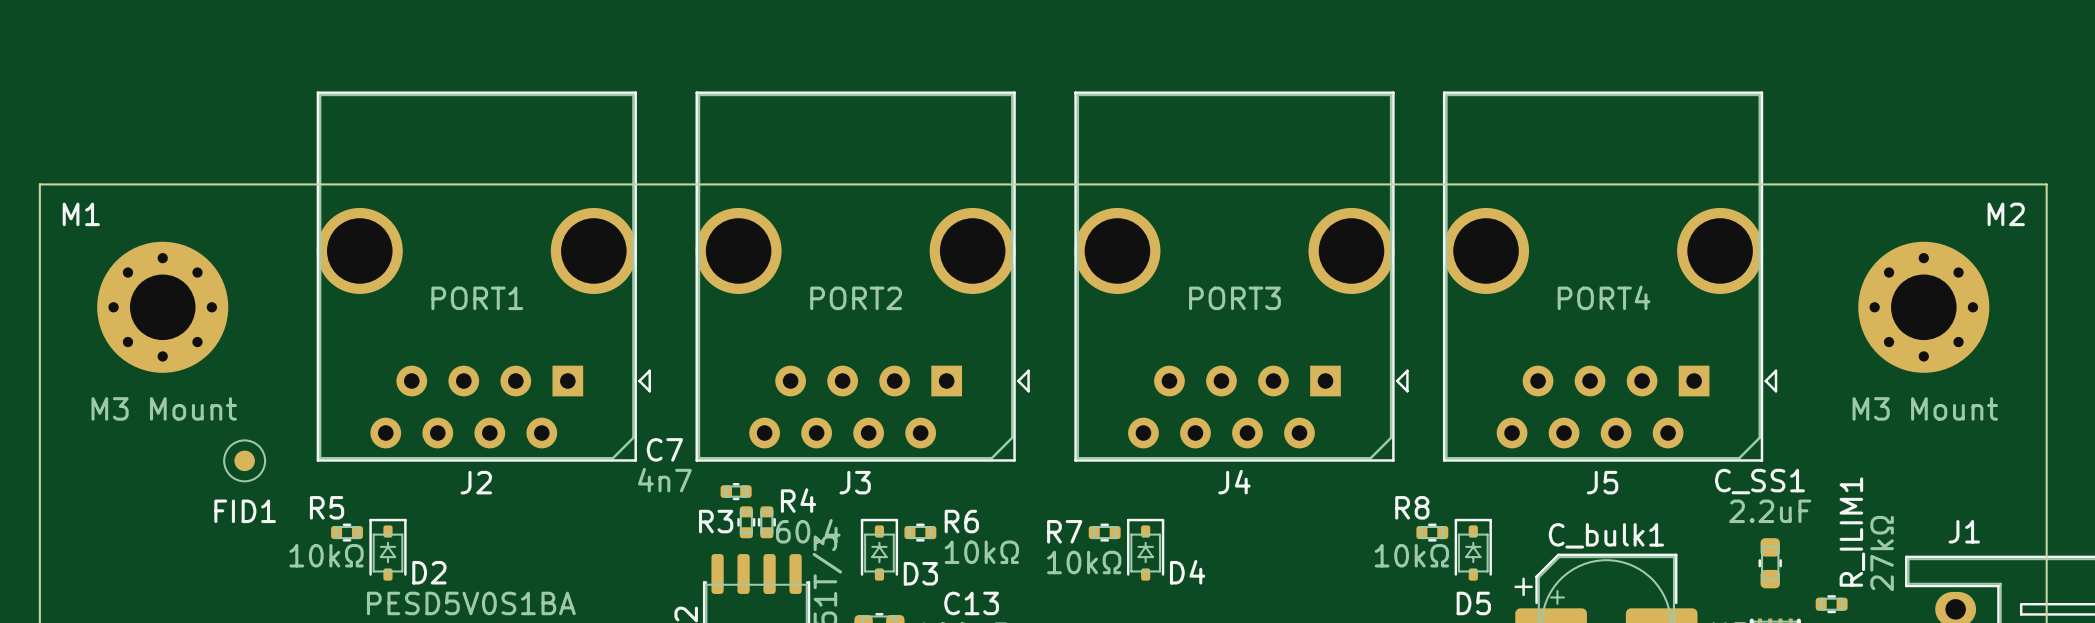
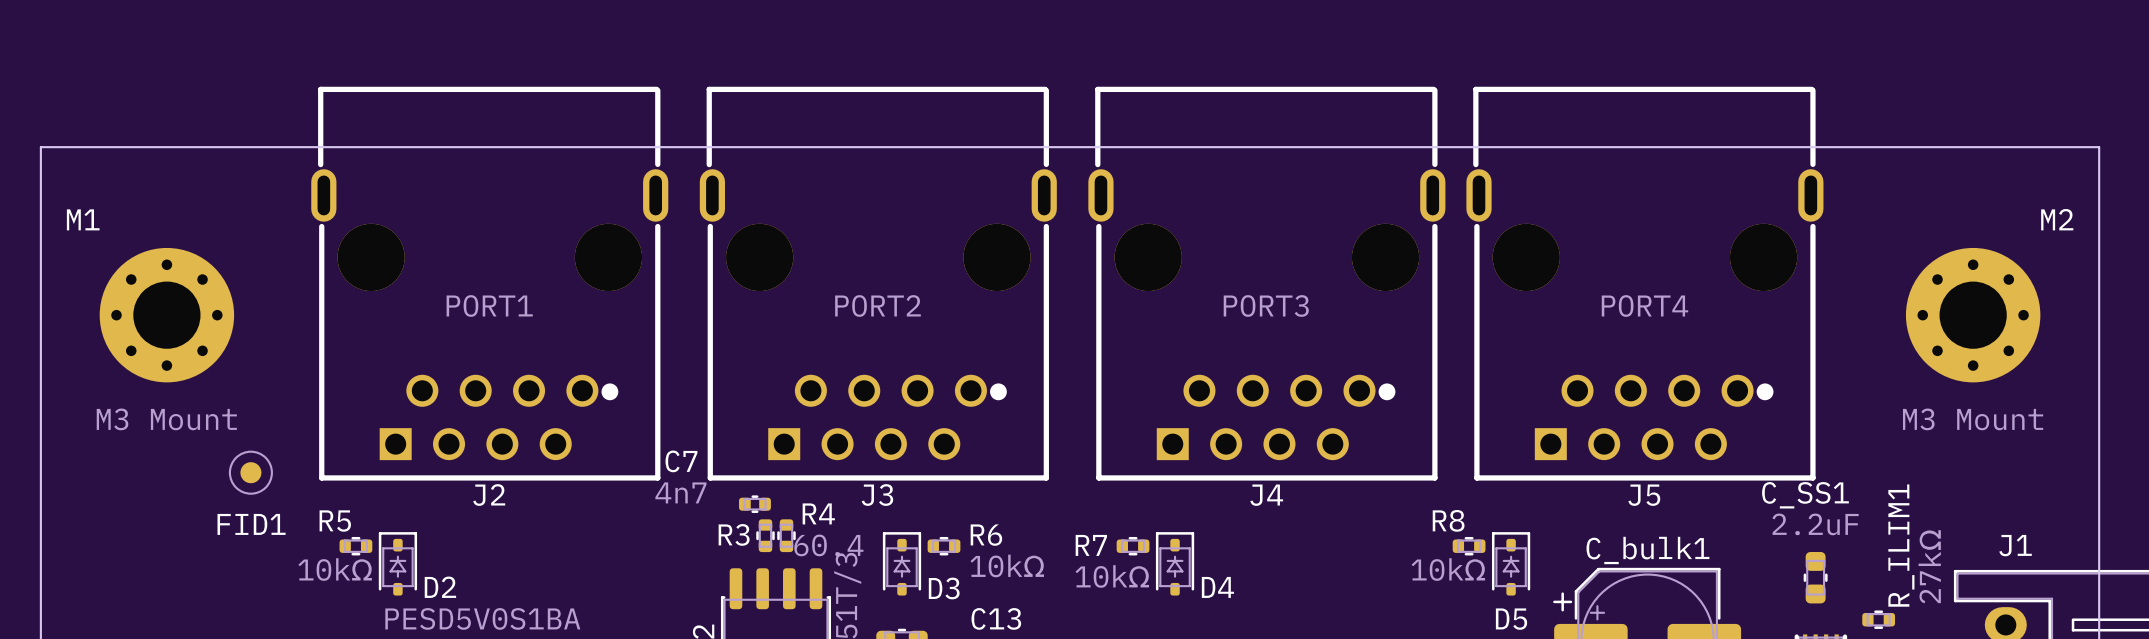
J2 footprint: [316, 91, 651, 462] -> [311, 86, 669, 481]
J3 footprint: [695, 91, 1030, 462] -> [699, 86, 1057, 481]
J4 footprint: [1074, 91, 1409, 462] -> [1088, 86, 1446, 481]
J5 footprint: [1442, 91, 1778, 462] -> [1466, 86, 1824, 481]
board edge: (39, 184) (2046, 184) -> (40, 189) (40, 147) (2099, 147) (2099, 189)

